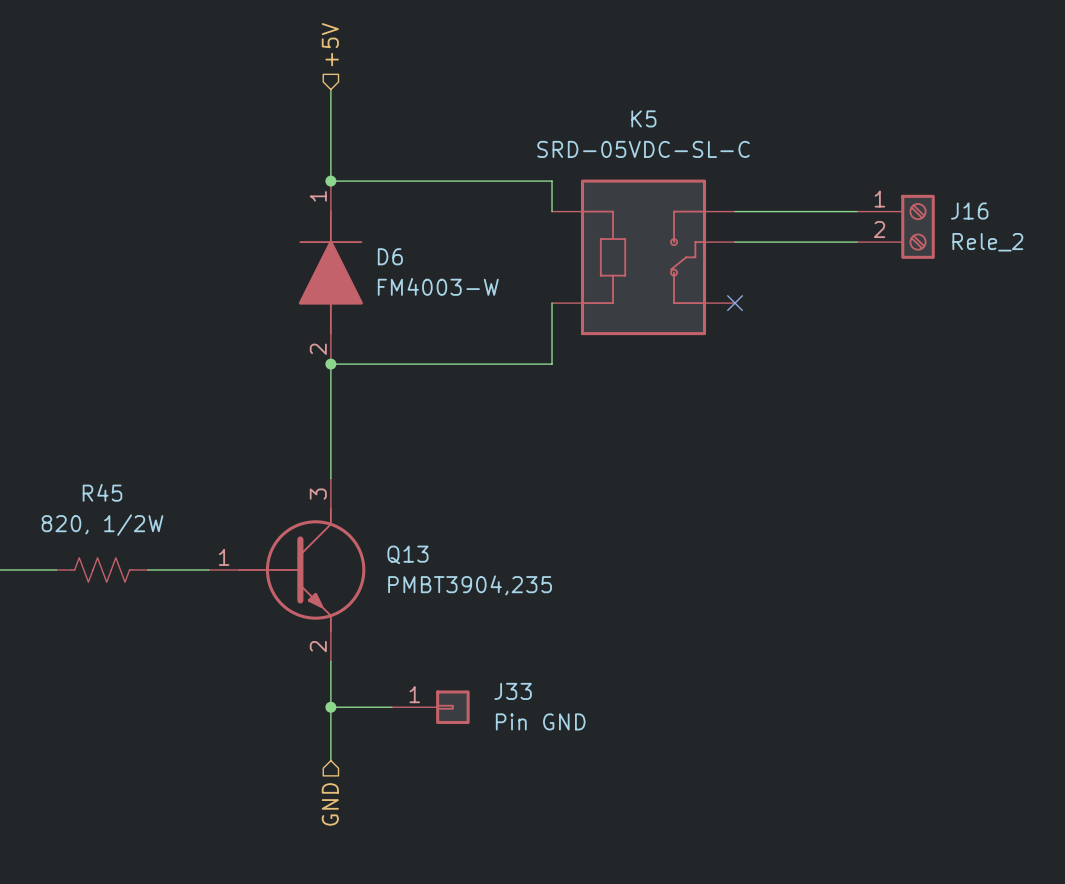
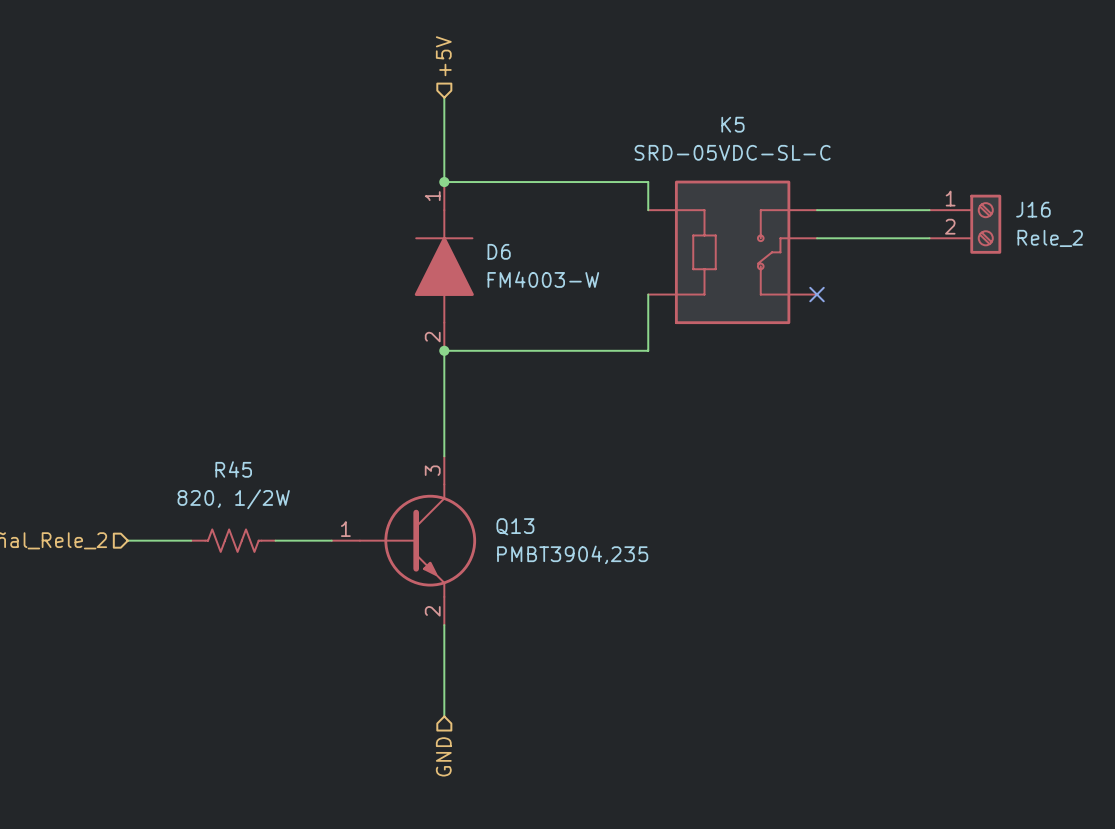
wire: (330, 707) (391, 707) -> none
junction: (330, 707) -> none
J33: Pin GND (430, 707) -> none

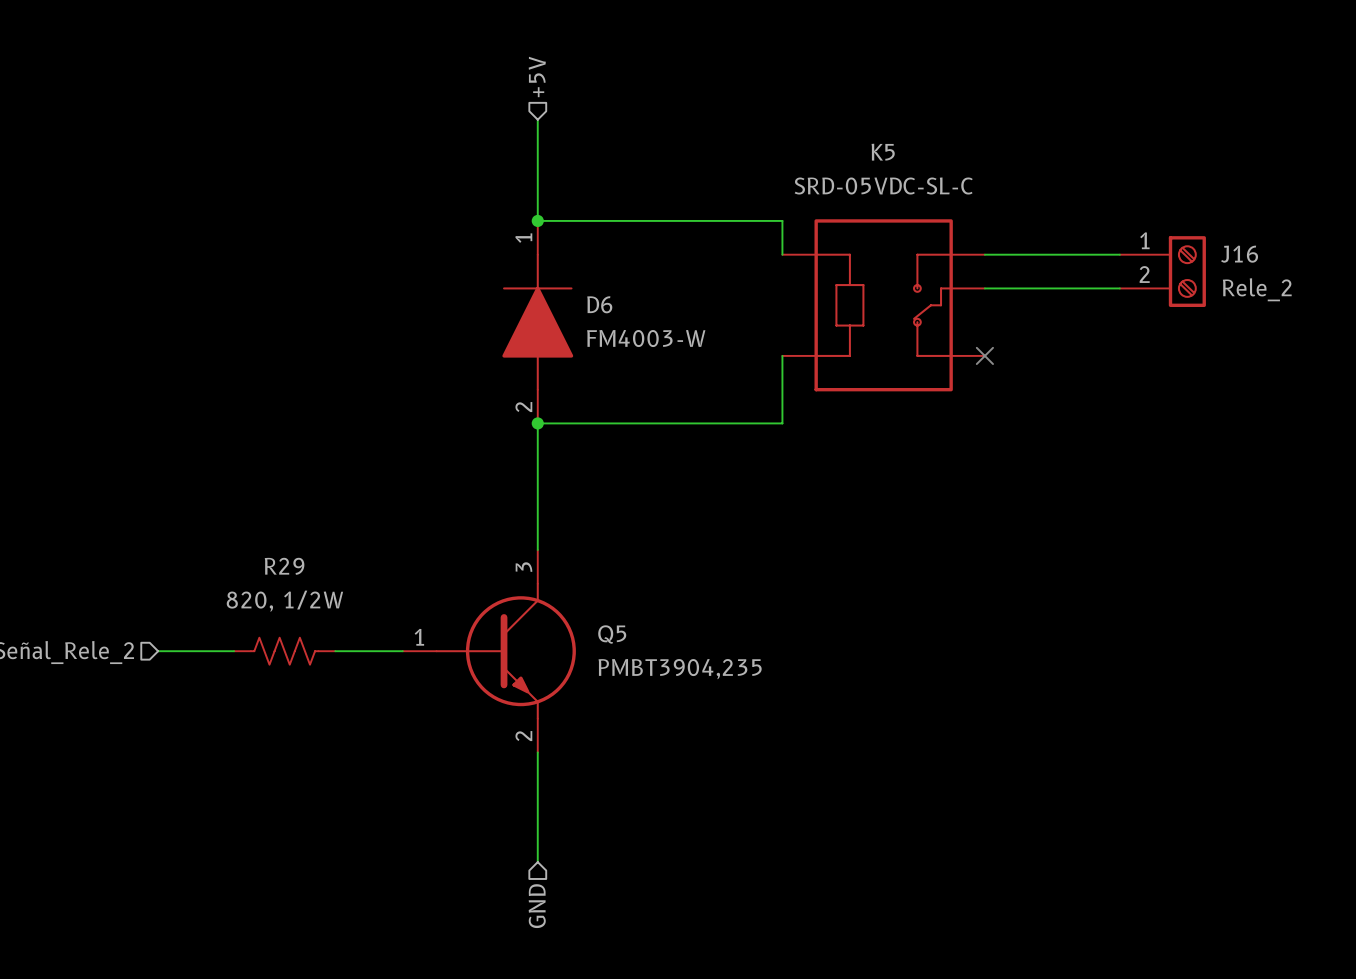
R45 name: R45 (233, 469) -> R29 (284, 566)
Q13 name: Q13 (515, 526) -> Q5 (612, 634)

